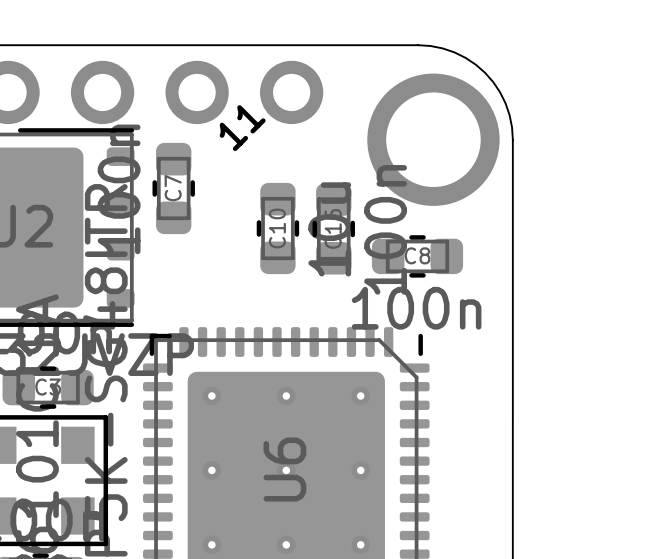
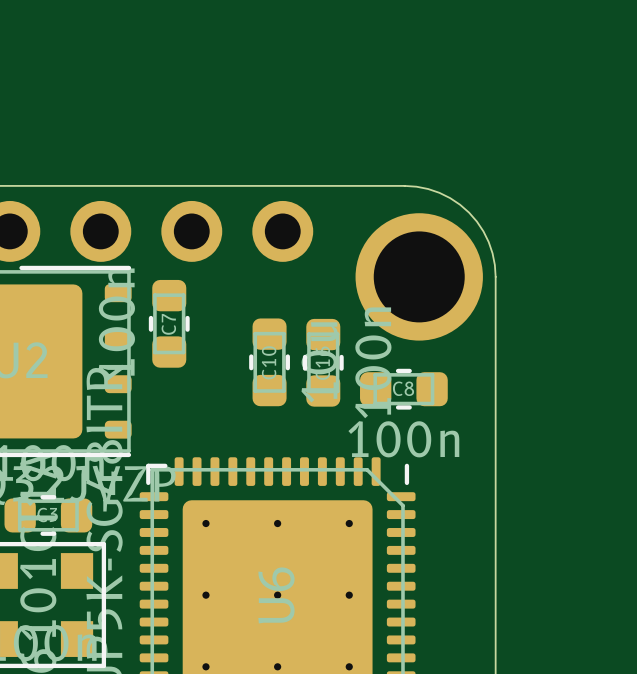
text: 11 (242, 128) -> none

